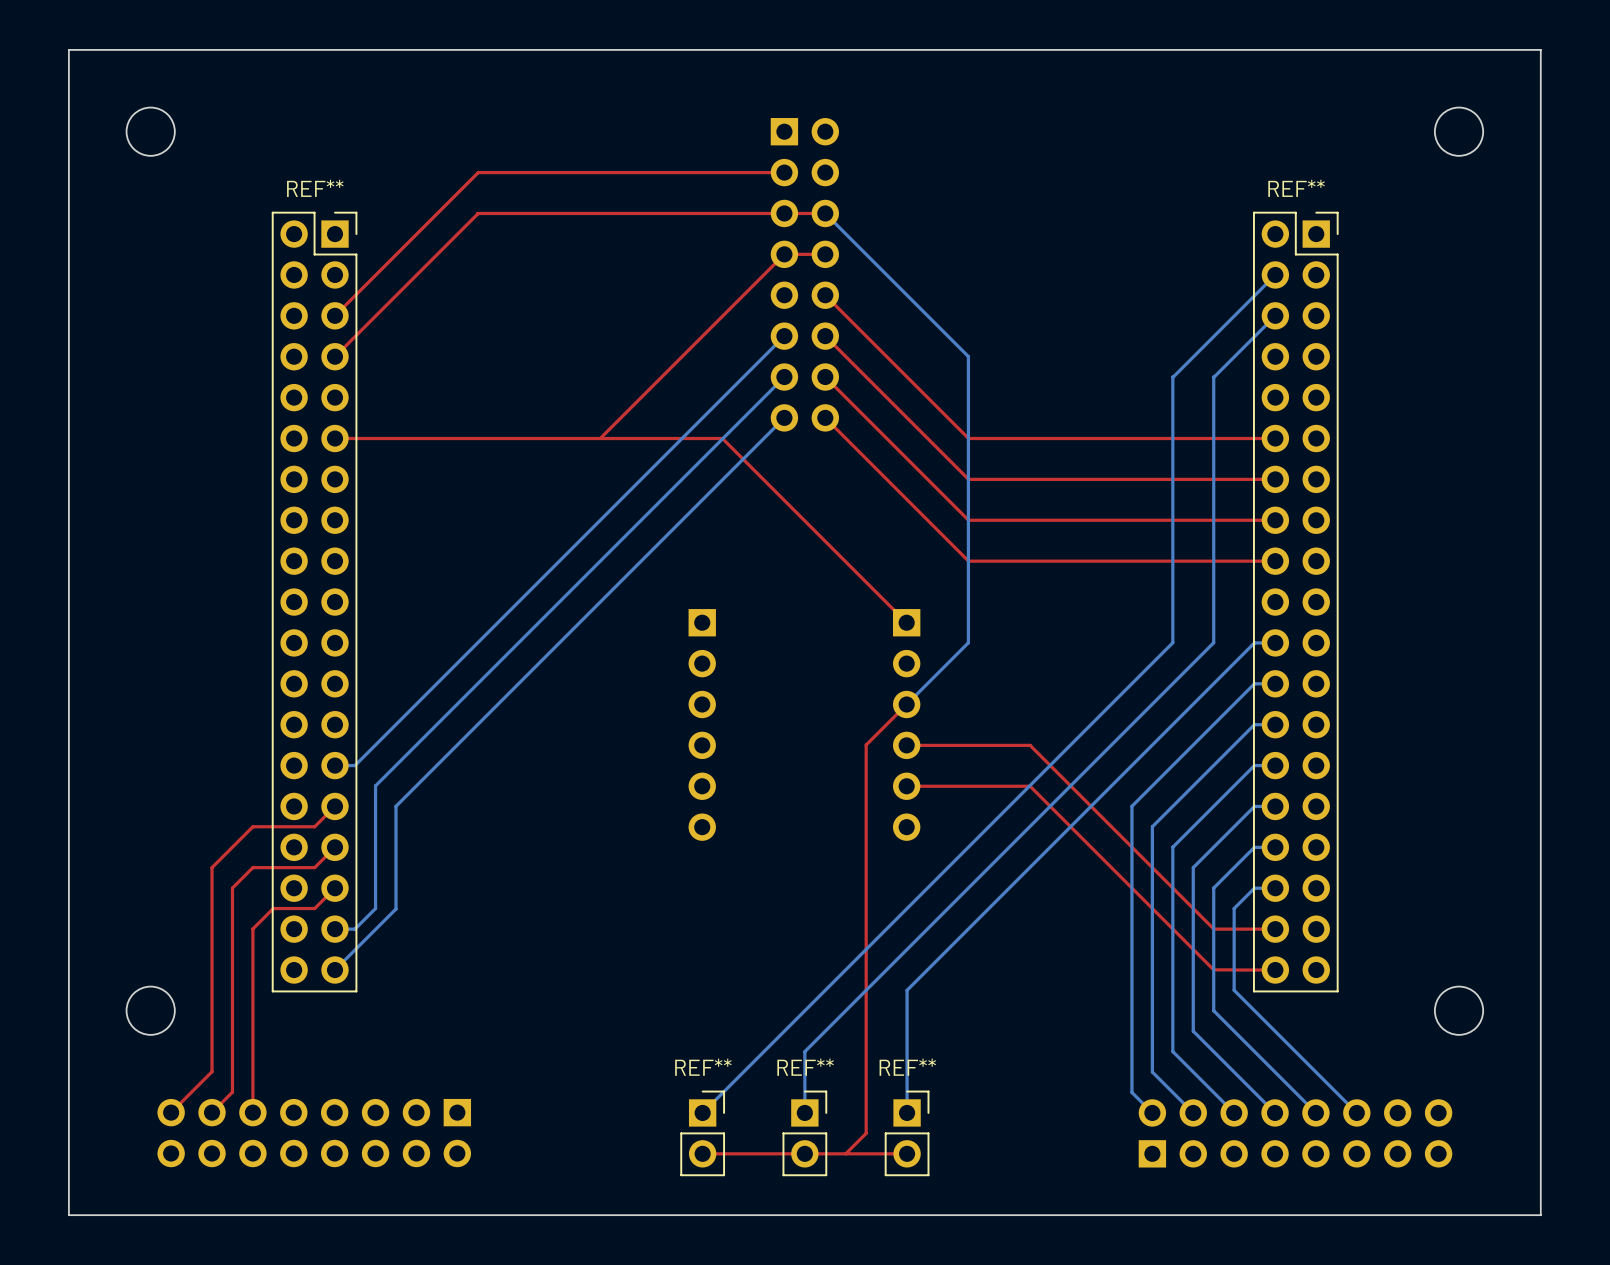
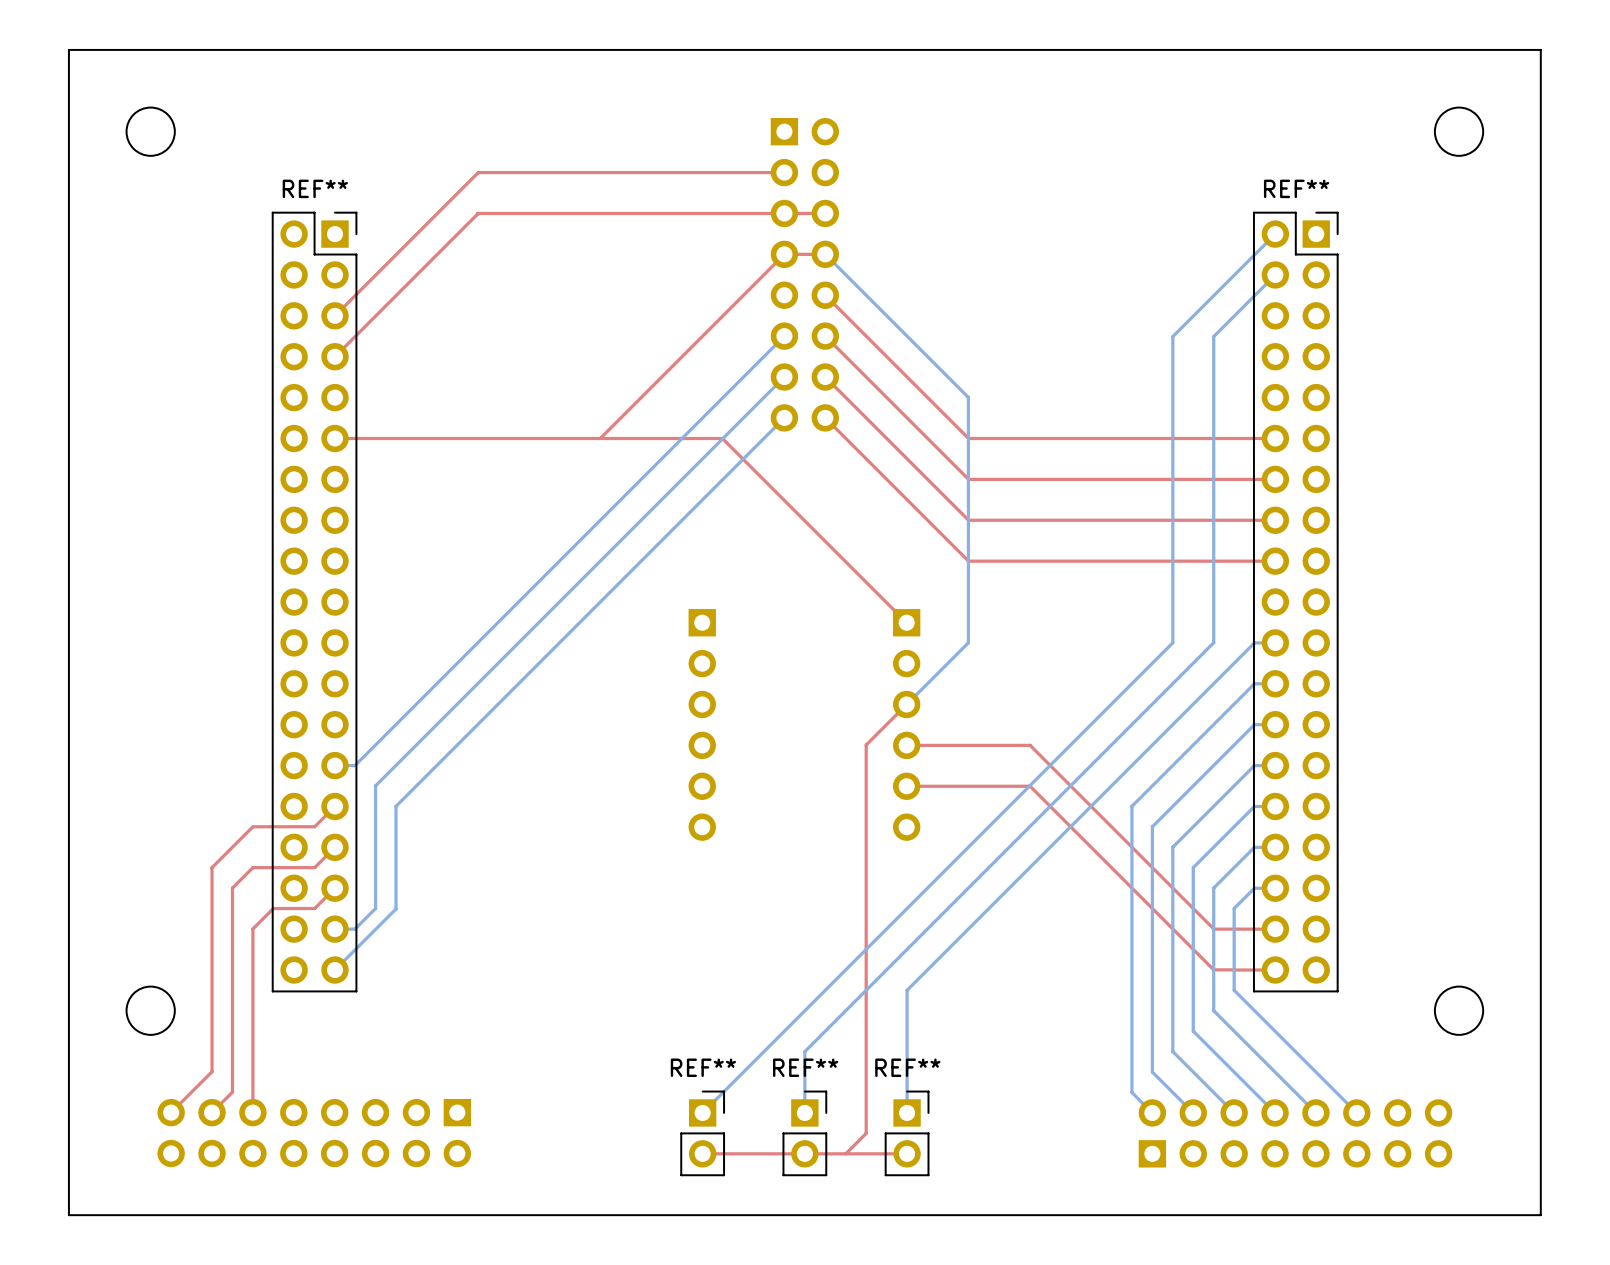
bottom track: (825, 213) (968, 356) (968, 397) -> (825, 254) (968, 397)
bottom track: none -> (1275, 234) (1172, 336) (1172, 377)
bottom track: (1275, 315) (1213, 377) -> none
bottom track: (1213, 336) (1172, 377) -> (1213, 336) (1213, 377)

